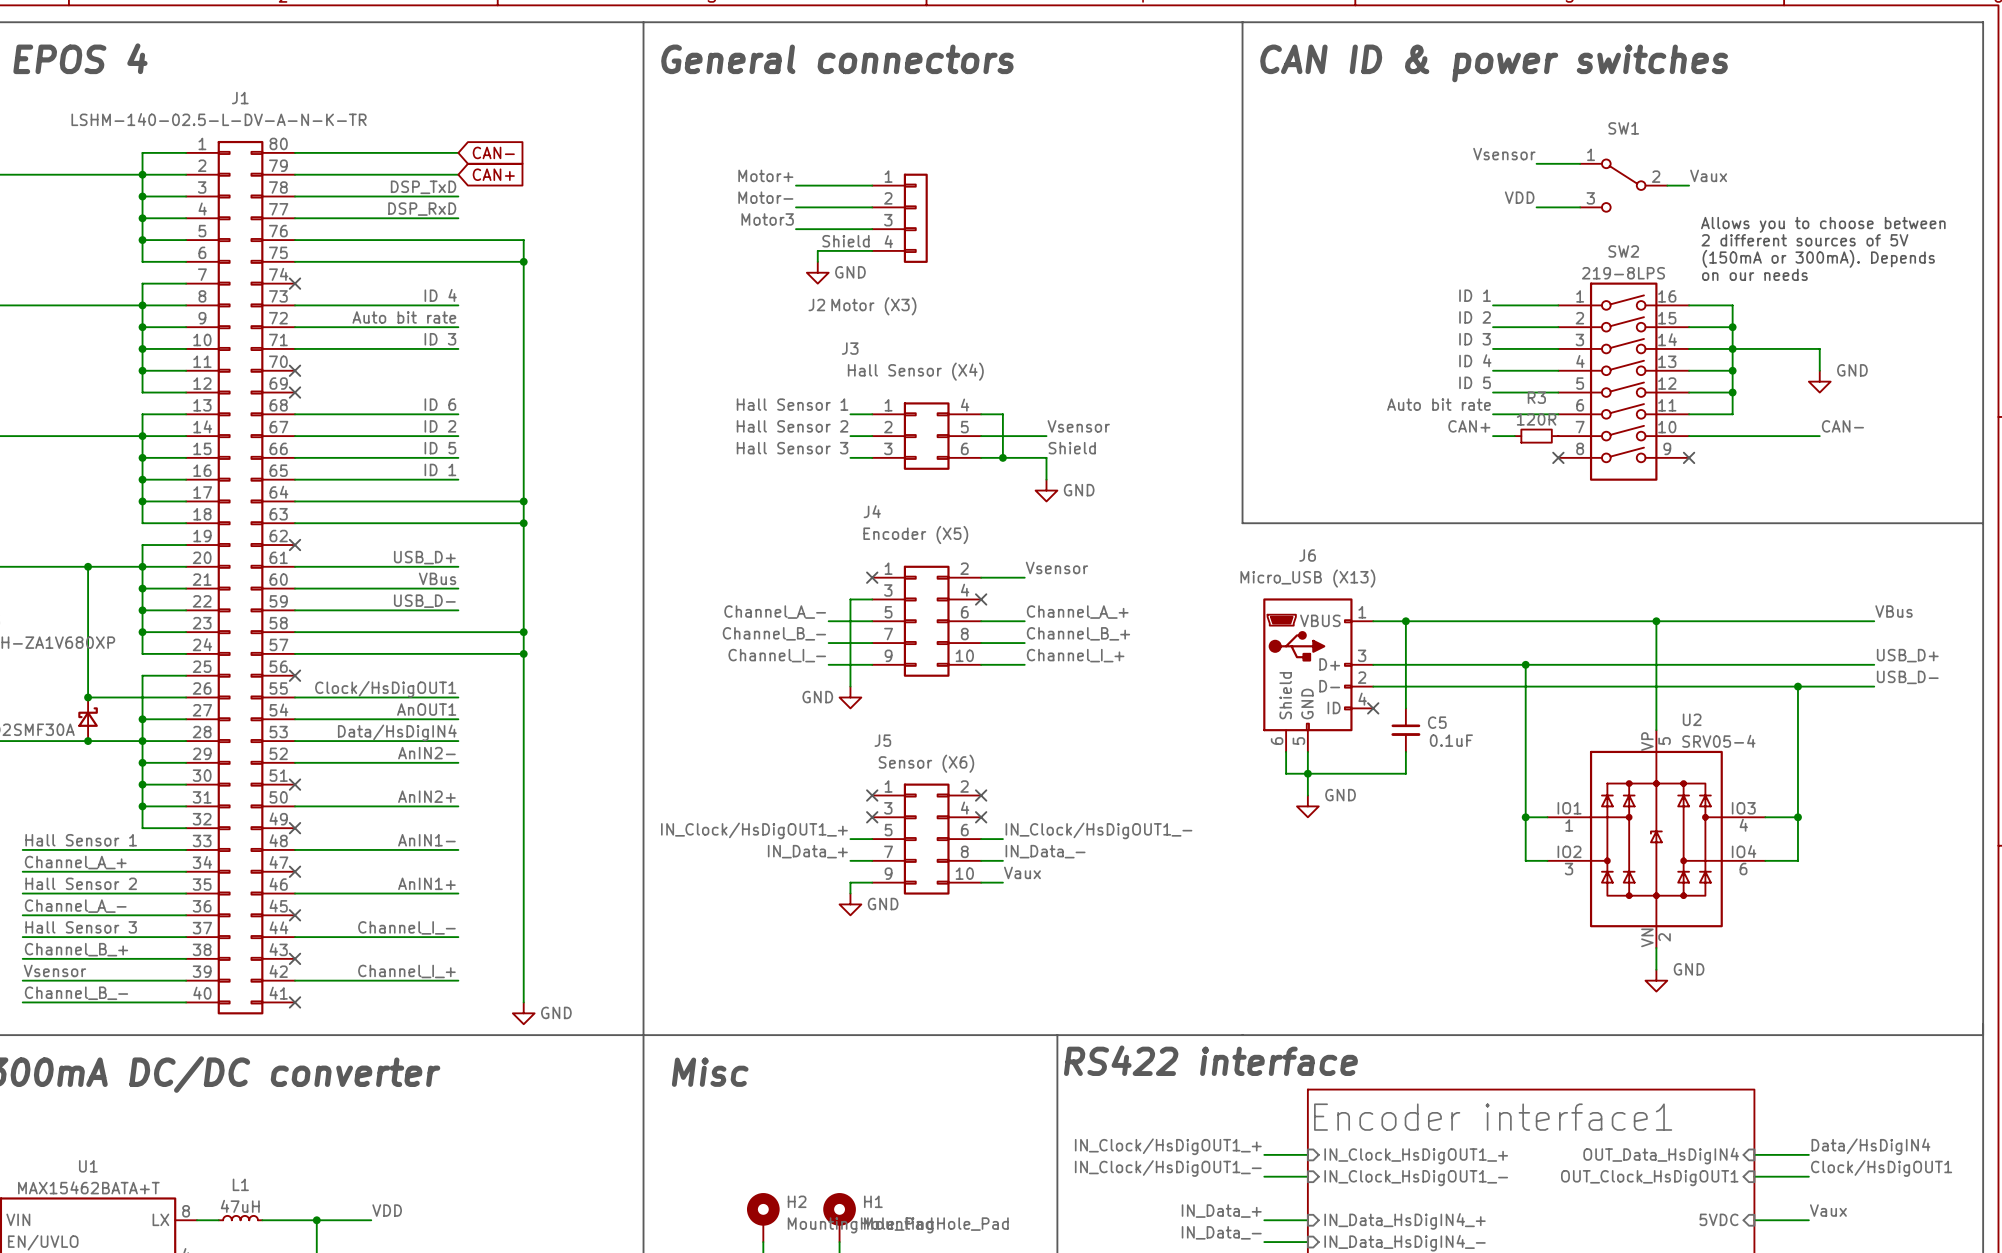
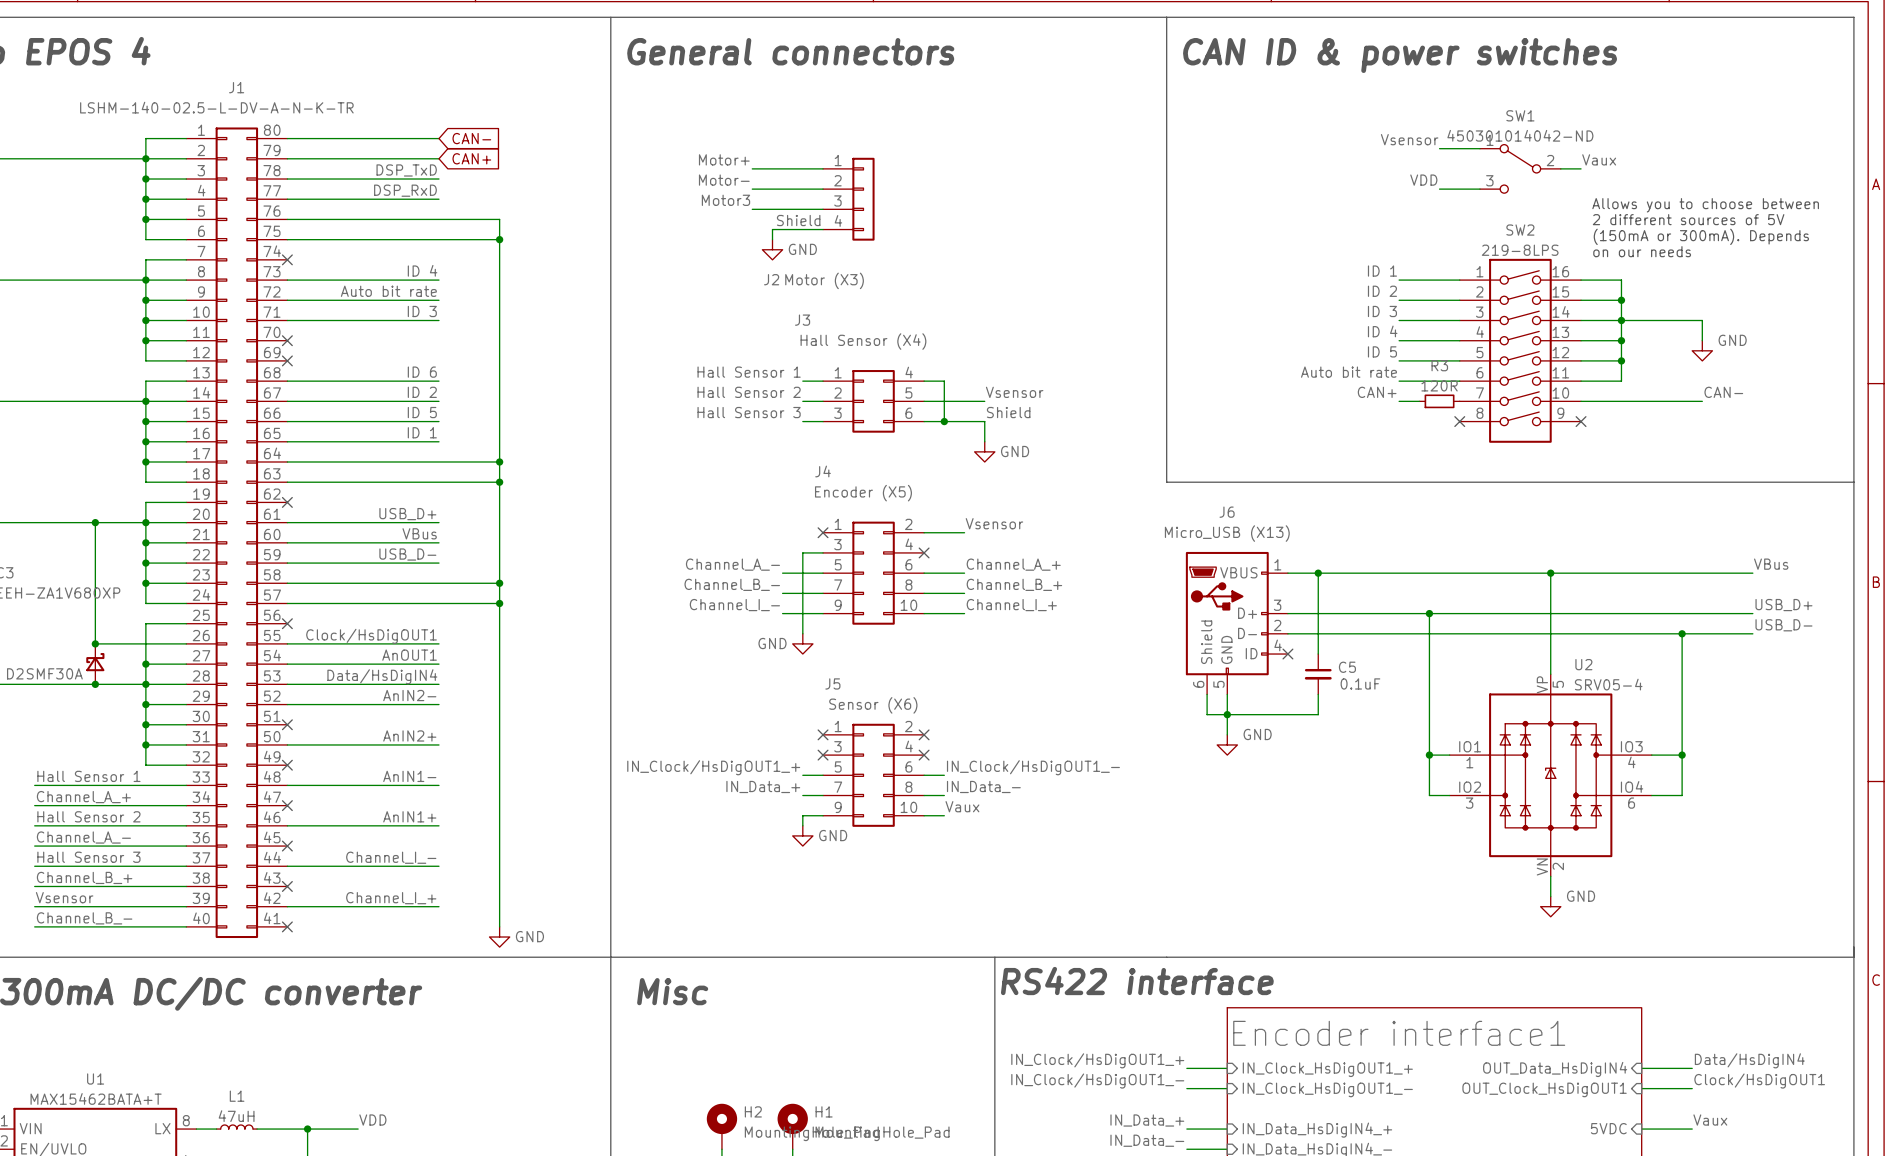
SW1 value: none -> 450301014042-ND (1520, 135)

